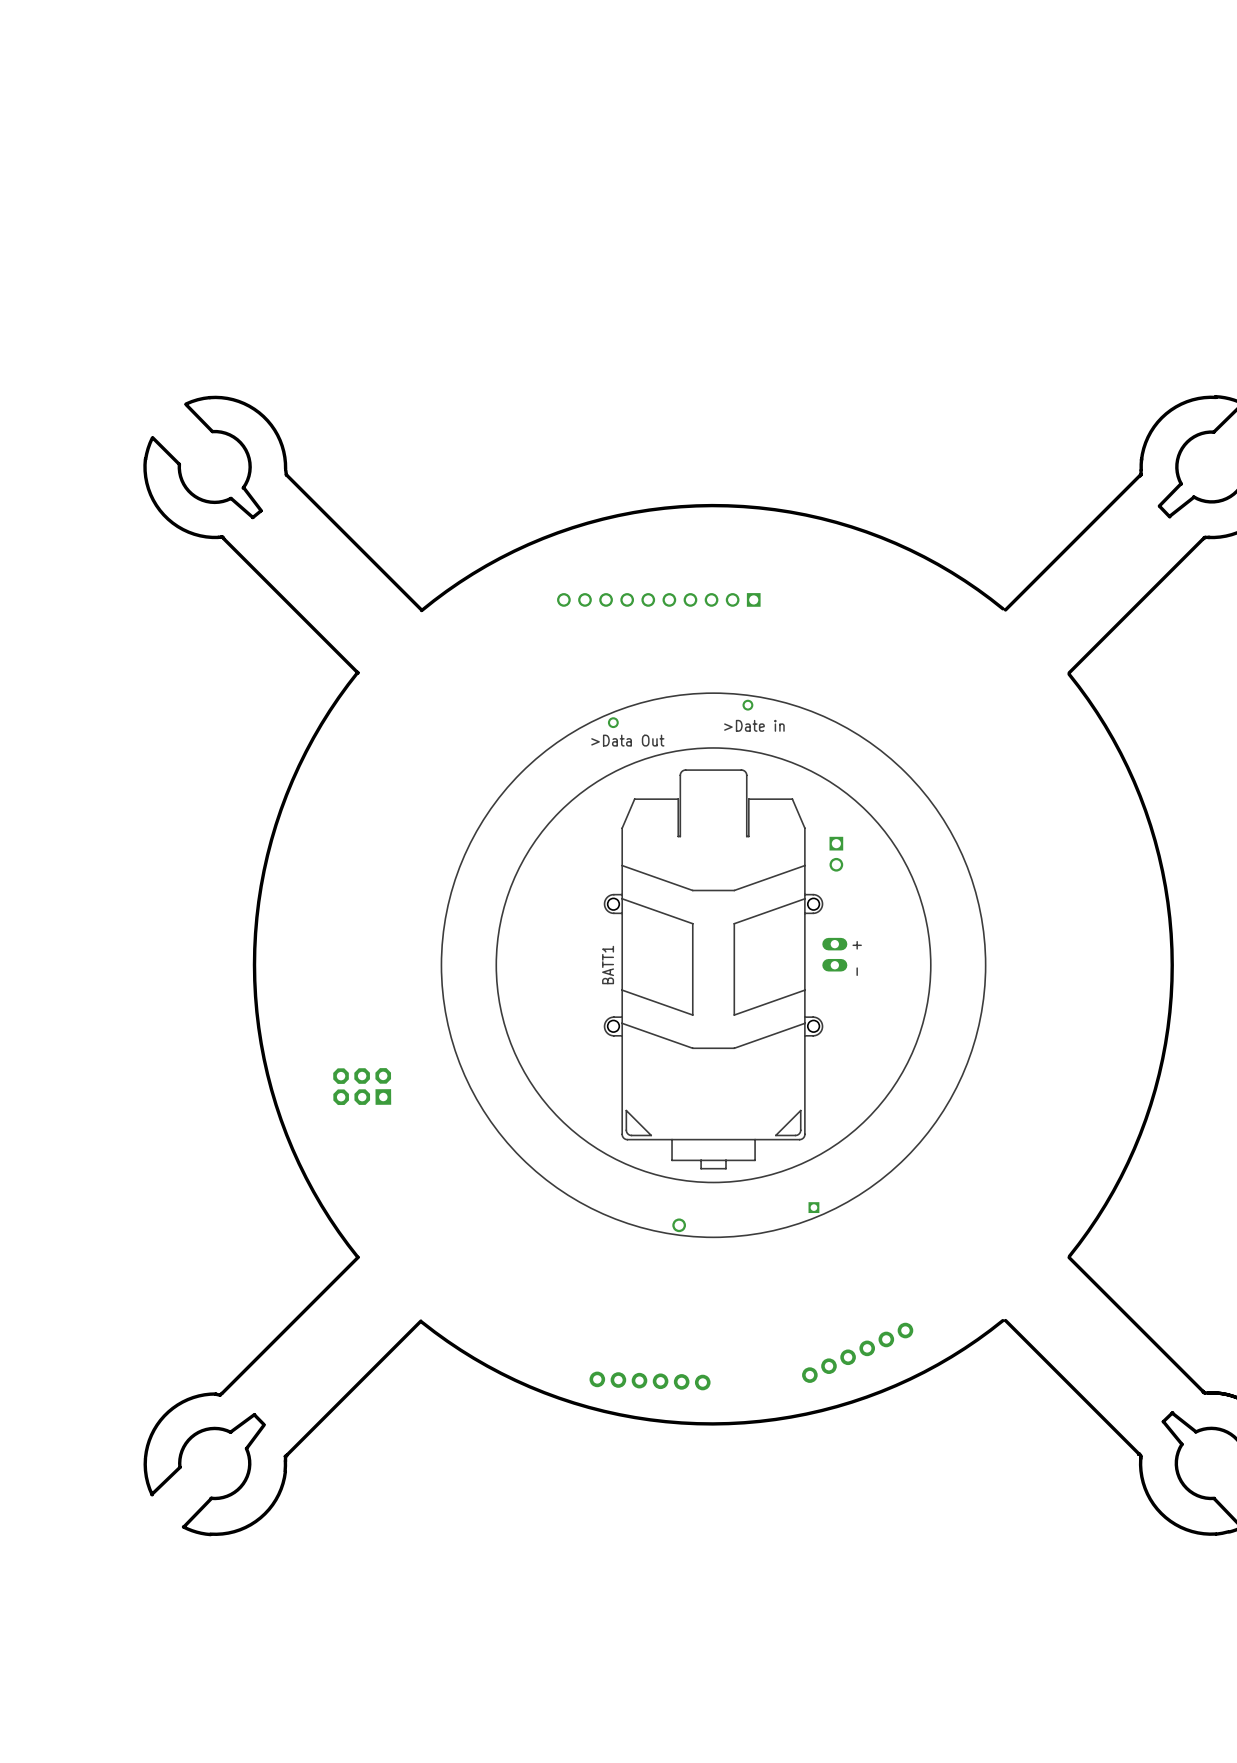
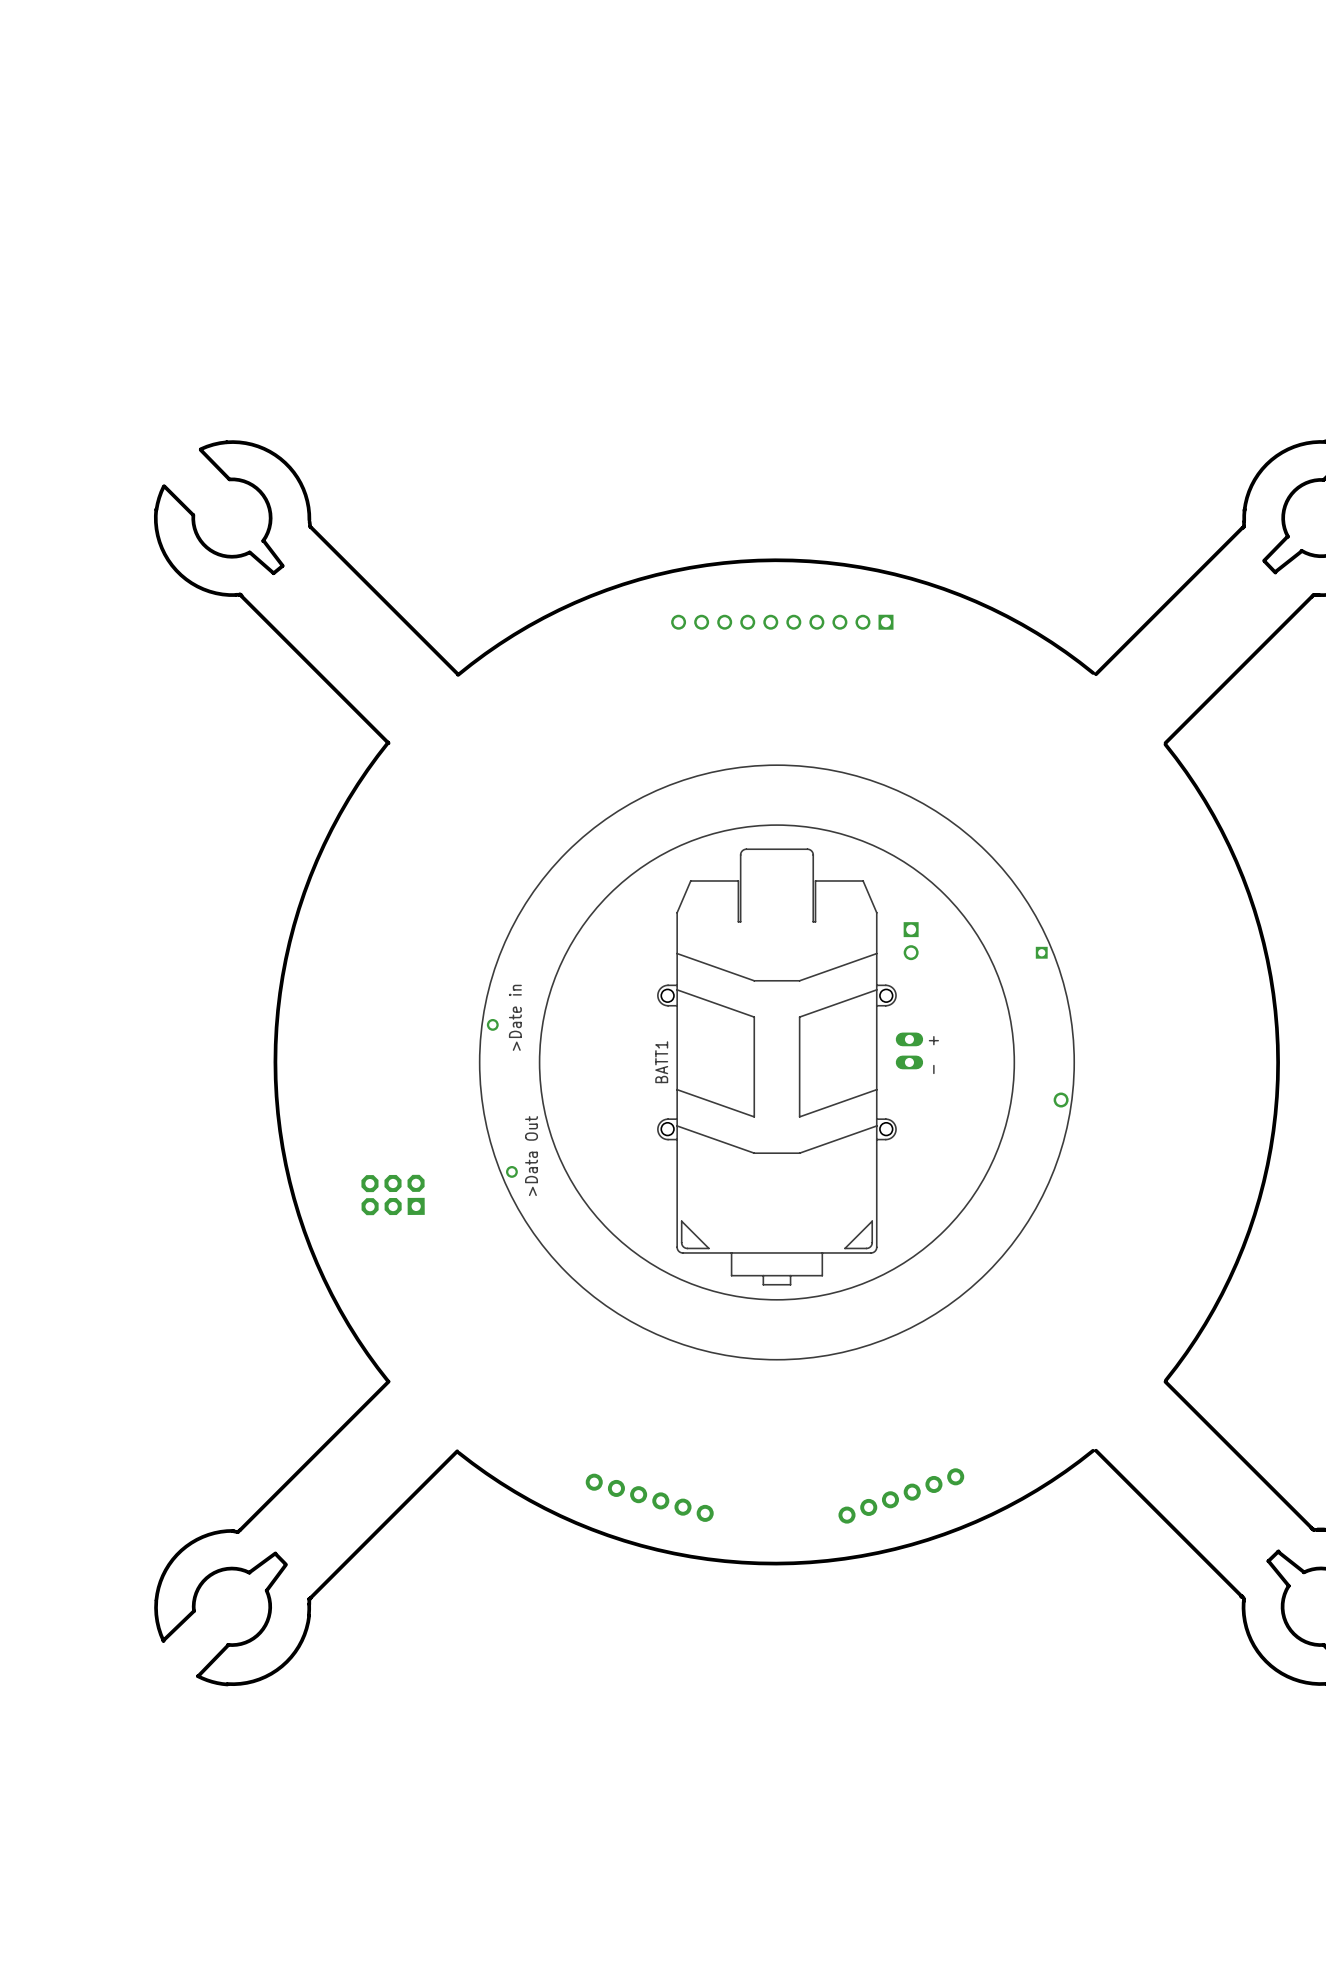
part position: (658, 599) -> (782, 622)
part rotation: 0° (713, 965) -> 90° counterclockwise (776, 1062)
part: (857, 1352) -> none
part: none -> (901, 1495)
part: none -> (649, 1497)
part: (650, 1380) -> none

